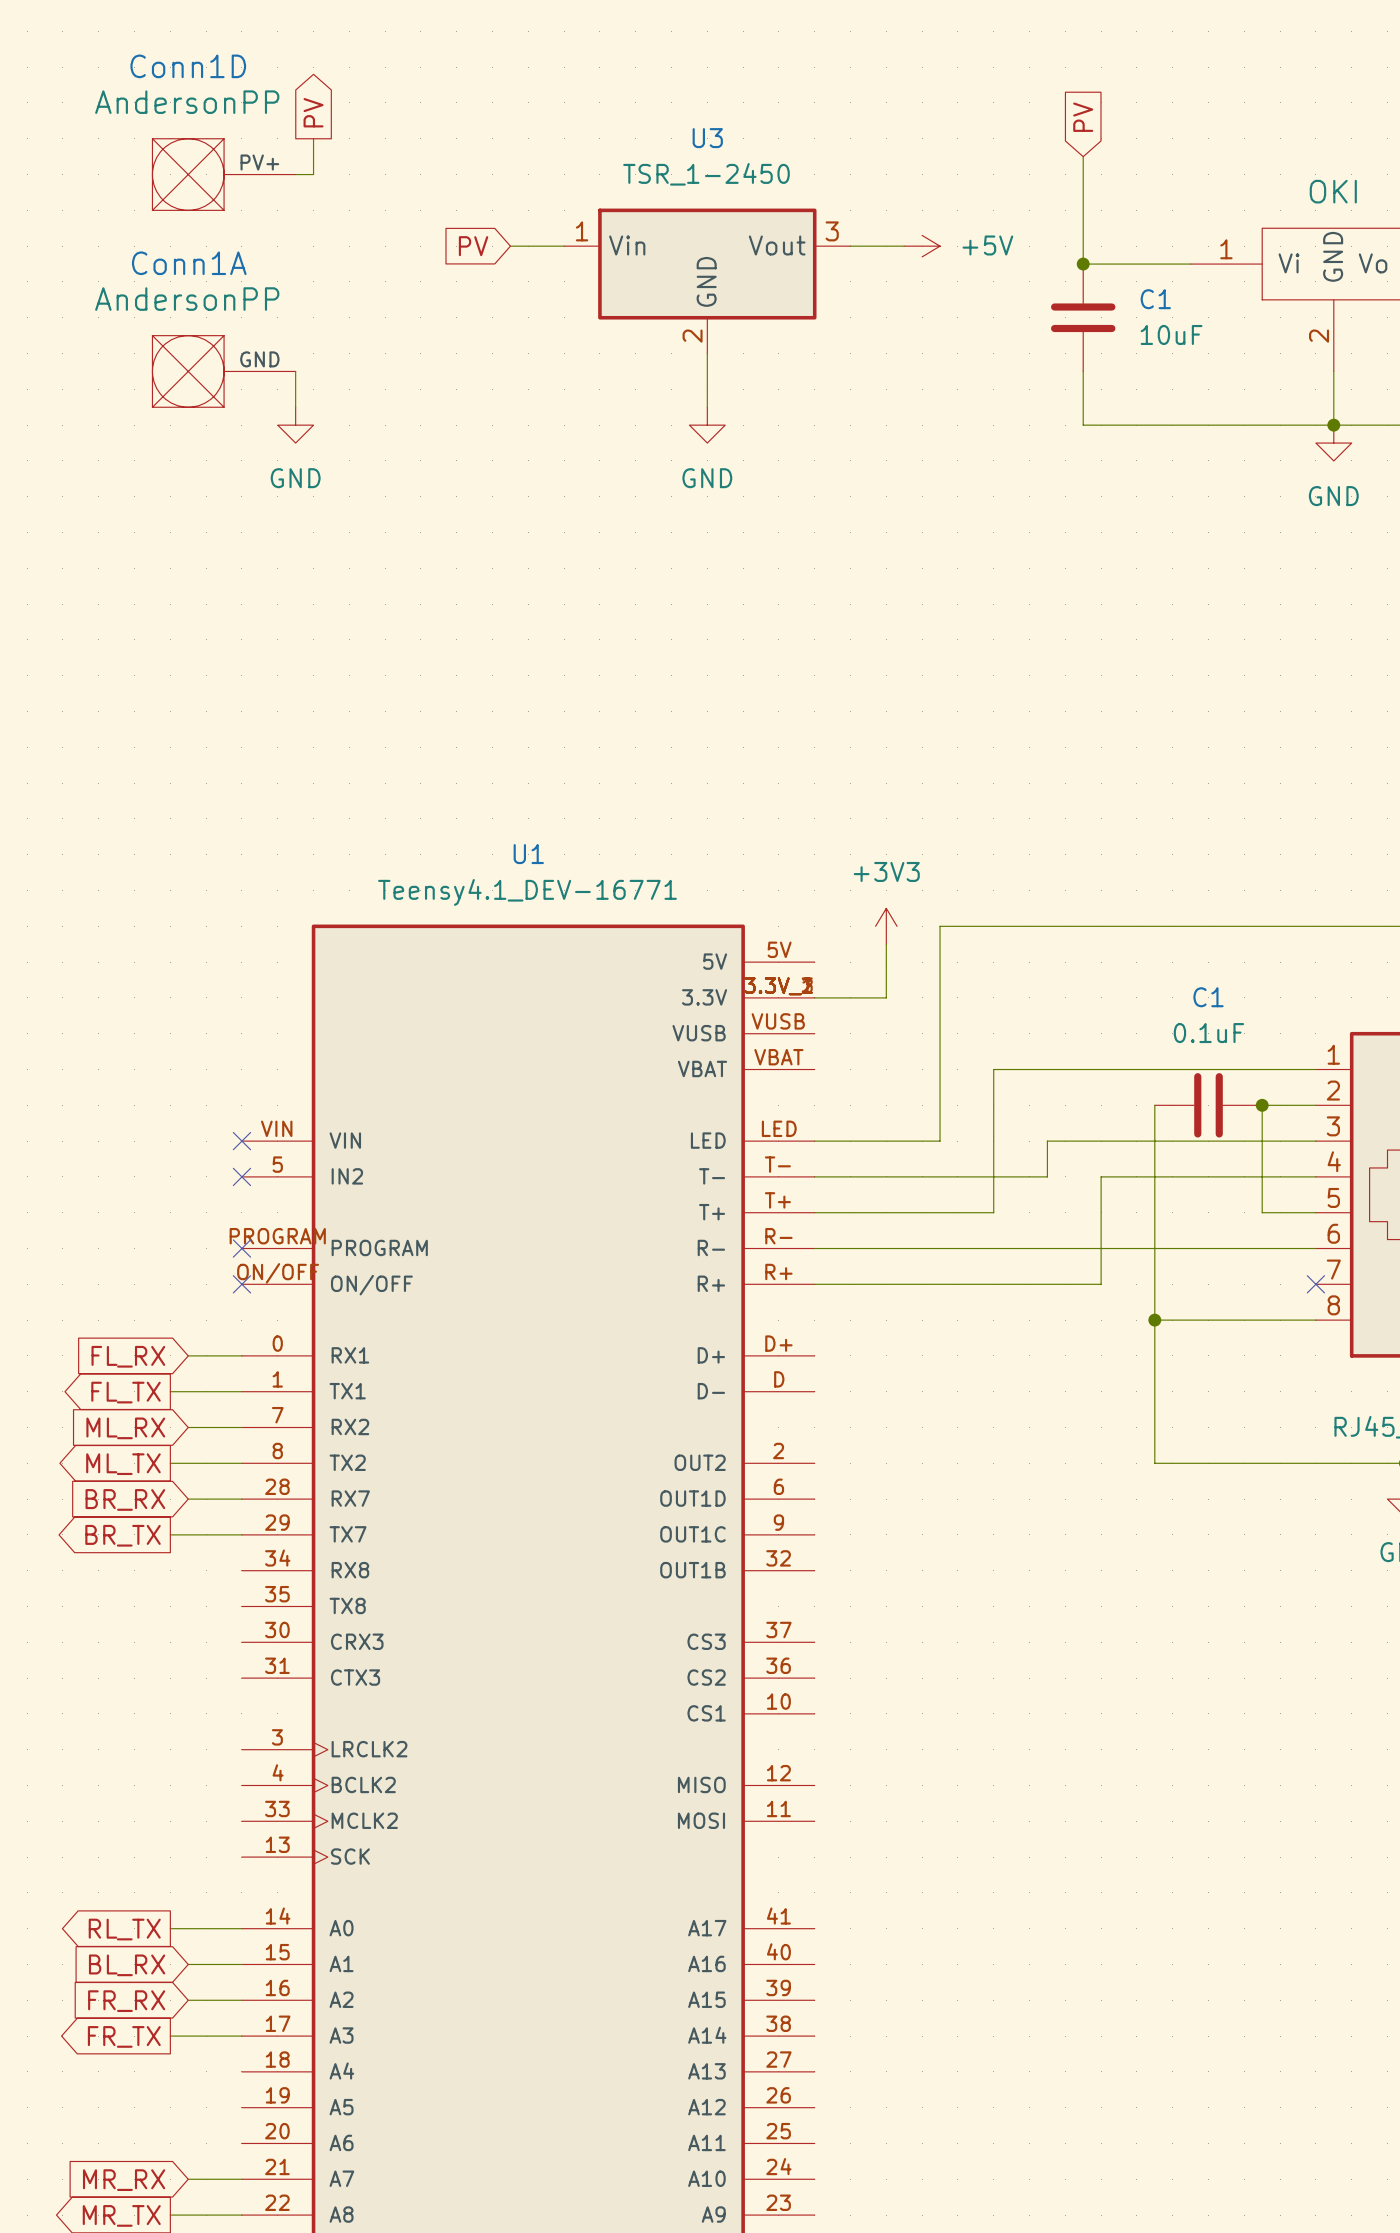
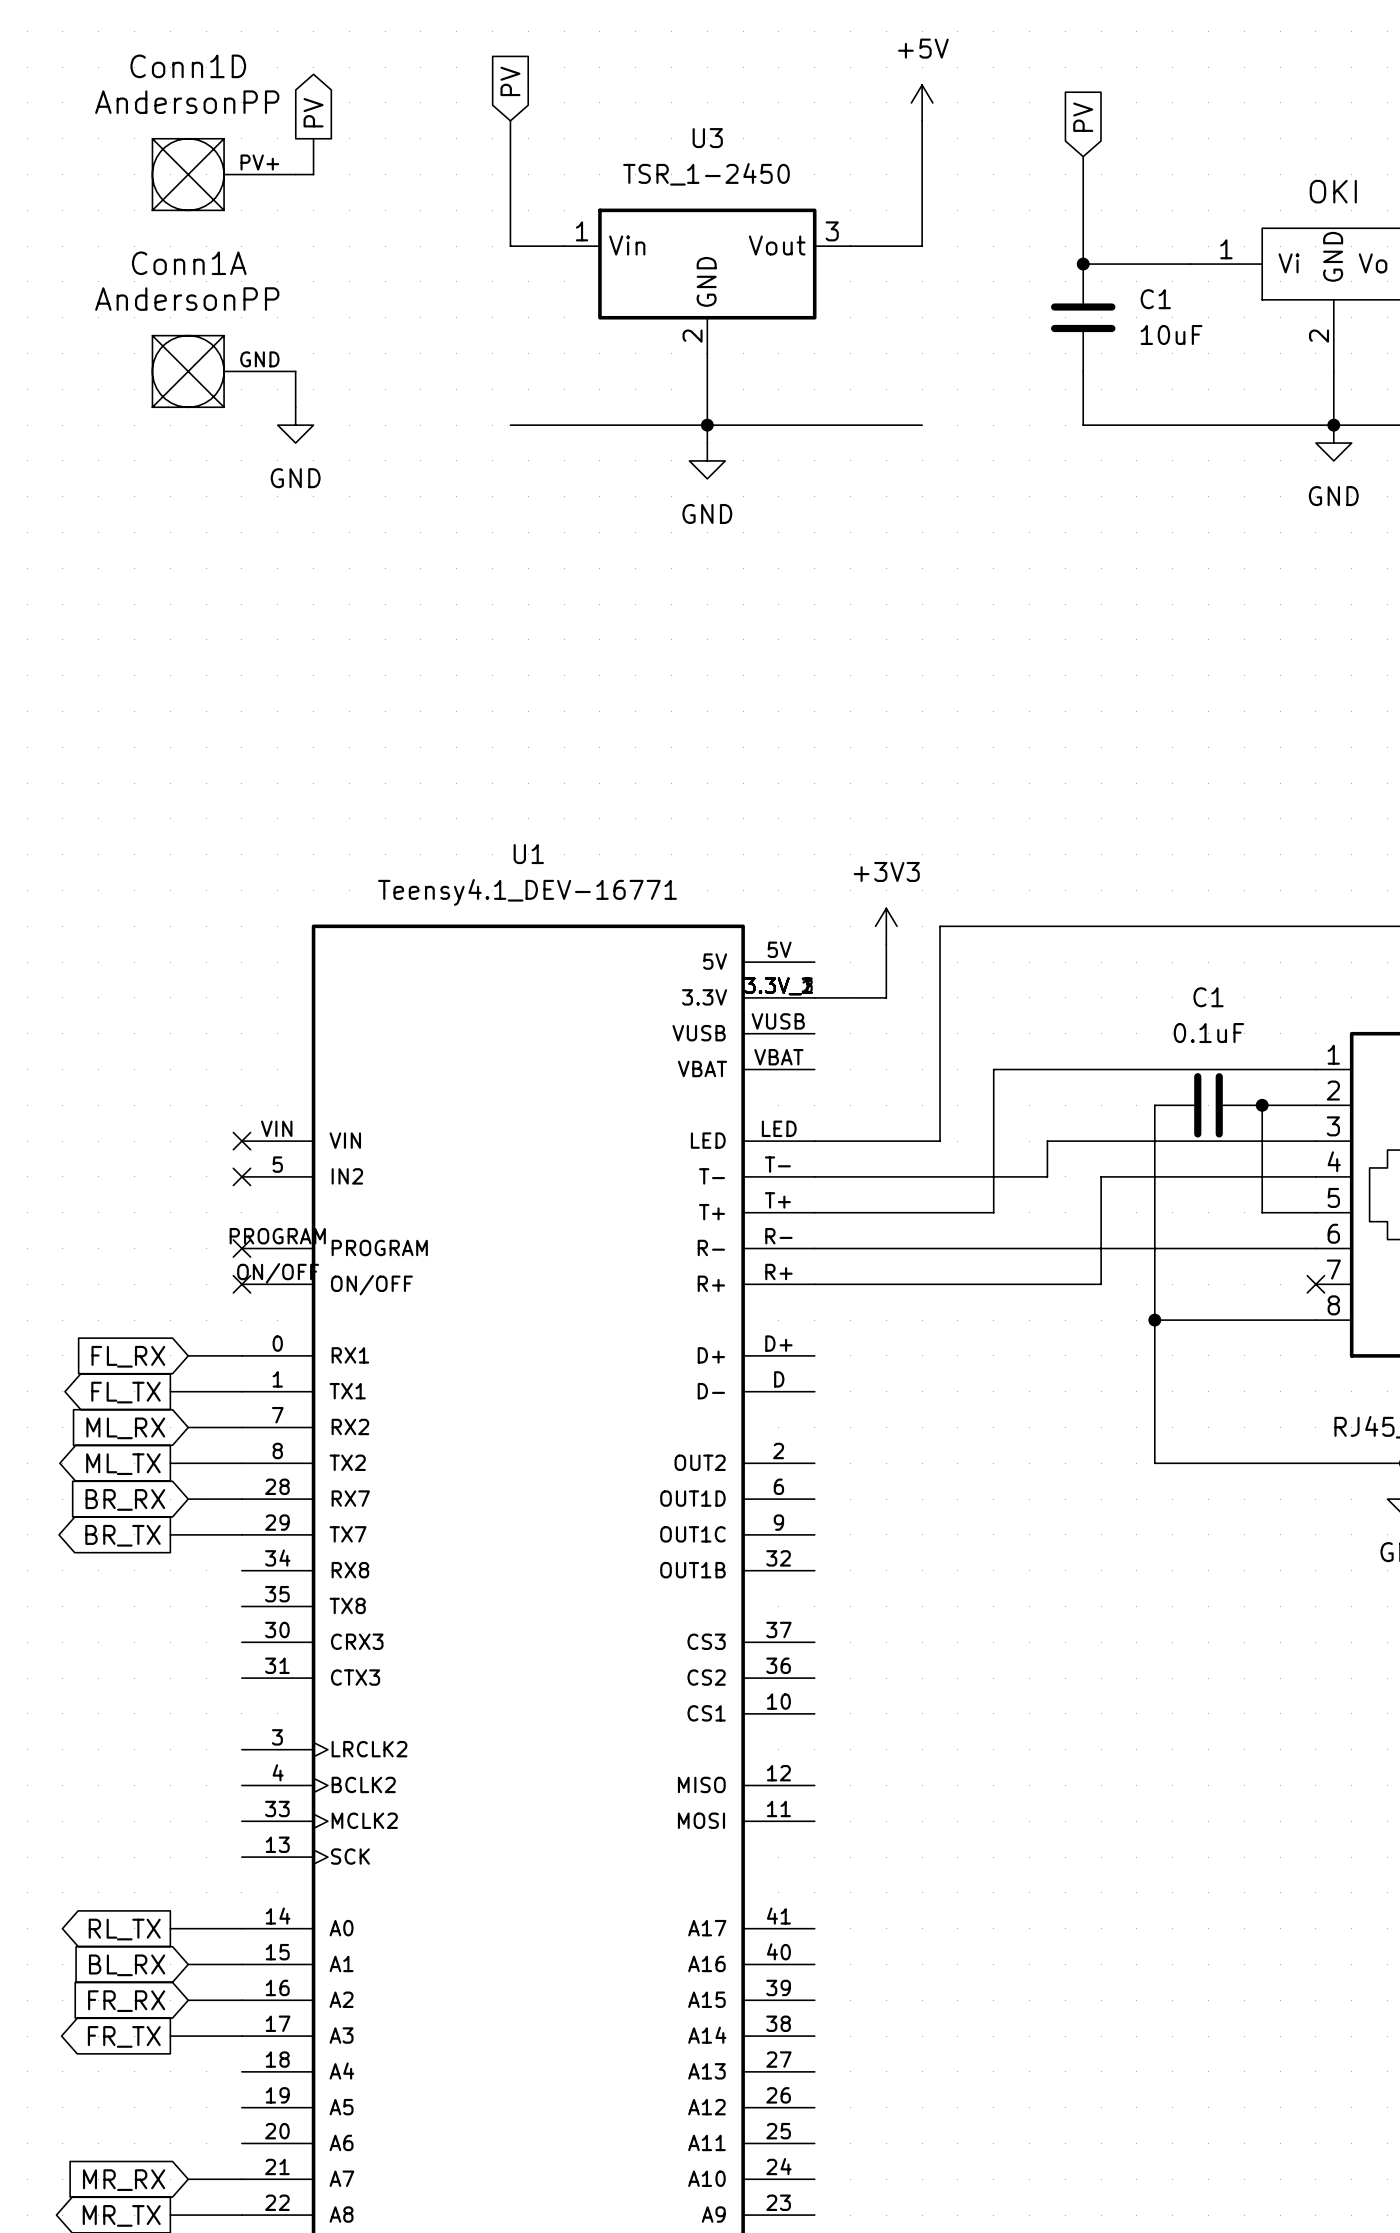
wire: none -> (510, 120) (510, 246)
wire: none -> (922, 120) (922, 246) (904, 246)
global label rotation: 0° (473, 246) -> 90° clockwise (510, 81)
global label position: PV (473, 246) -> PV (510, 81)
power symbol rotation: 0° (922, 246) -> 90° counterclockwise (922, 102)
power symbol position: +5V (922, 246) -> +5V (922, 102)
wire: none -> (510, 425) (922, 425)
power symbol position: GND (707, 425) -> GND (707, 460)
junction: none -> (707, 425)

